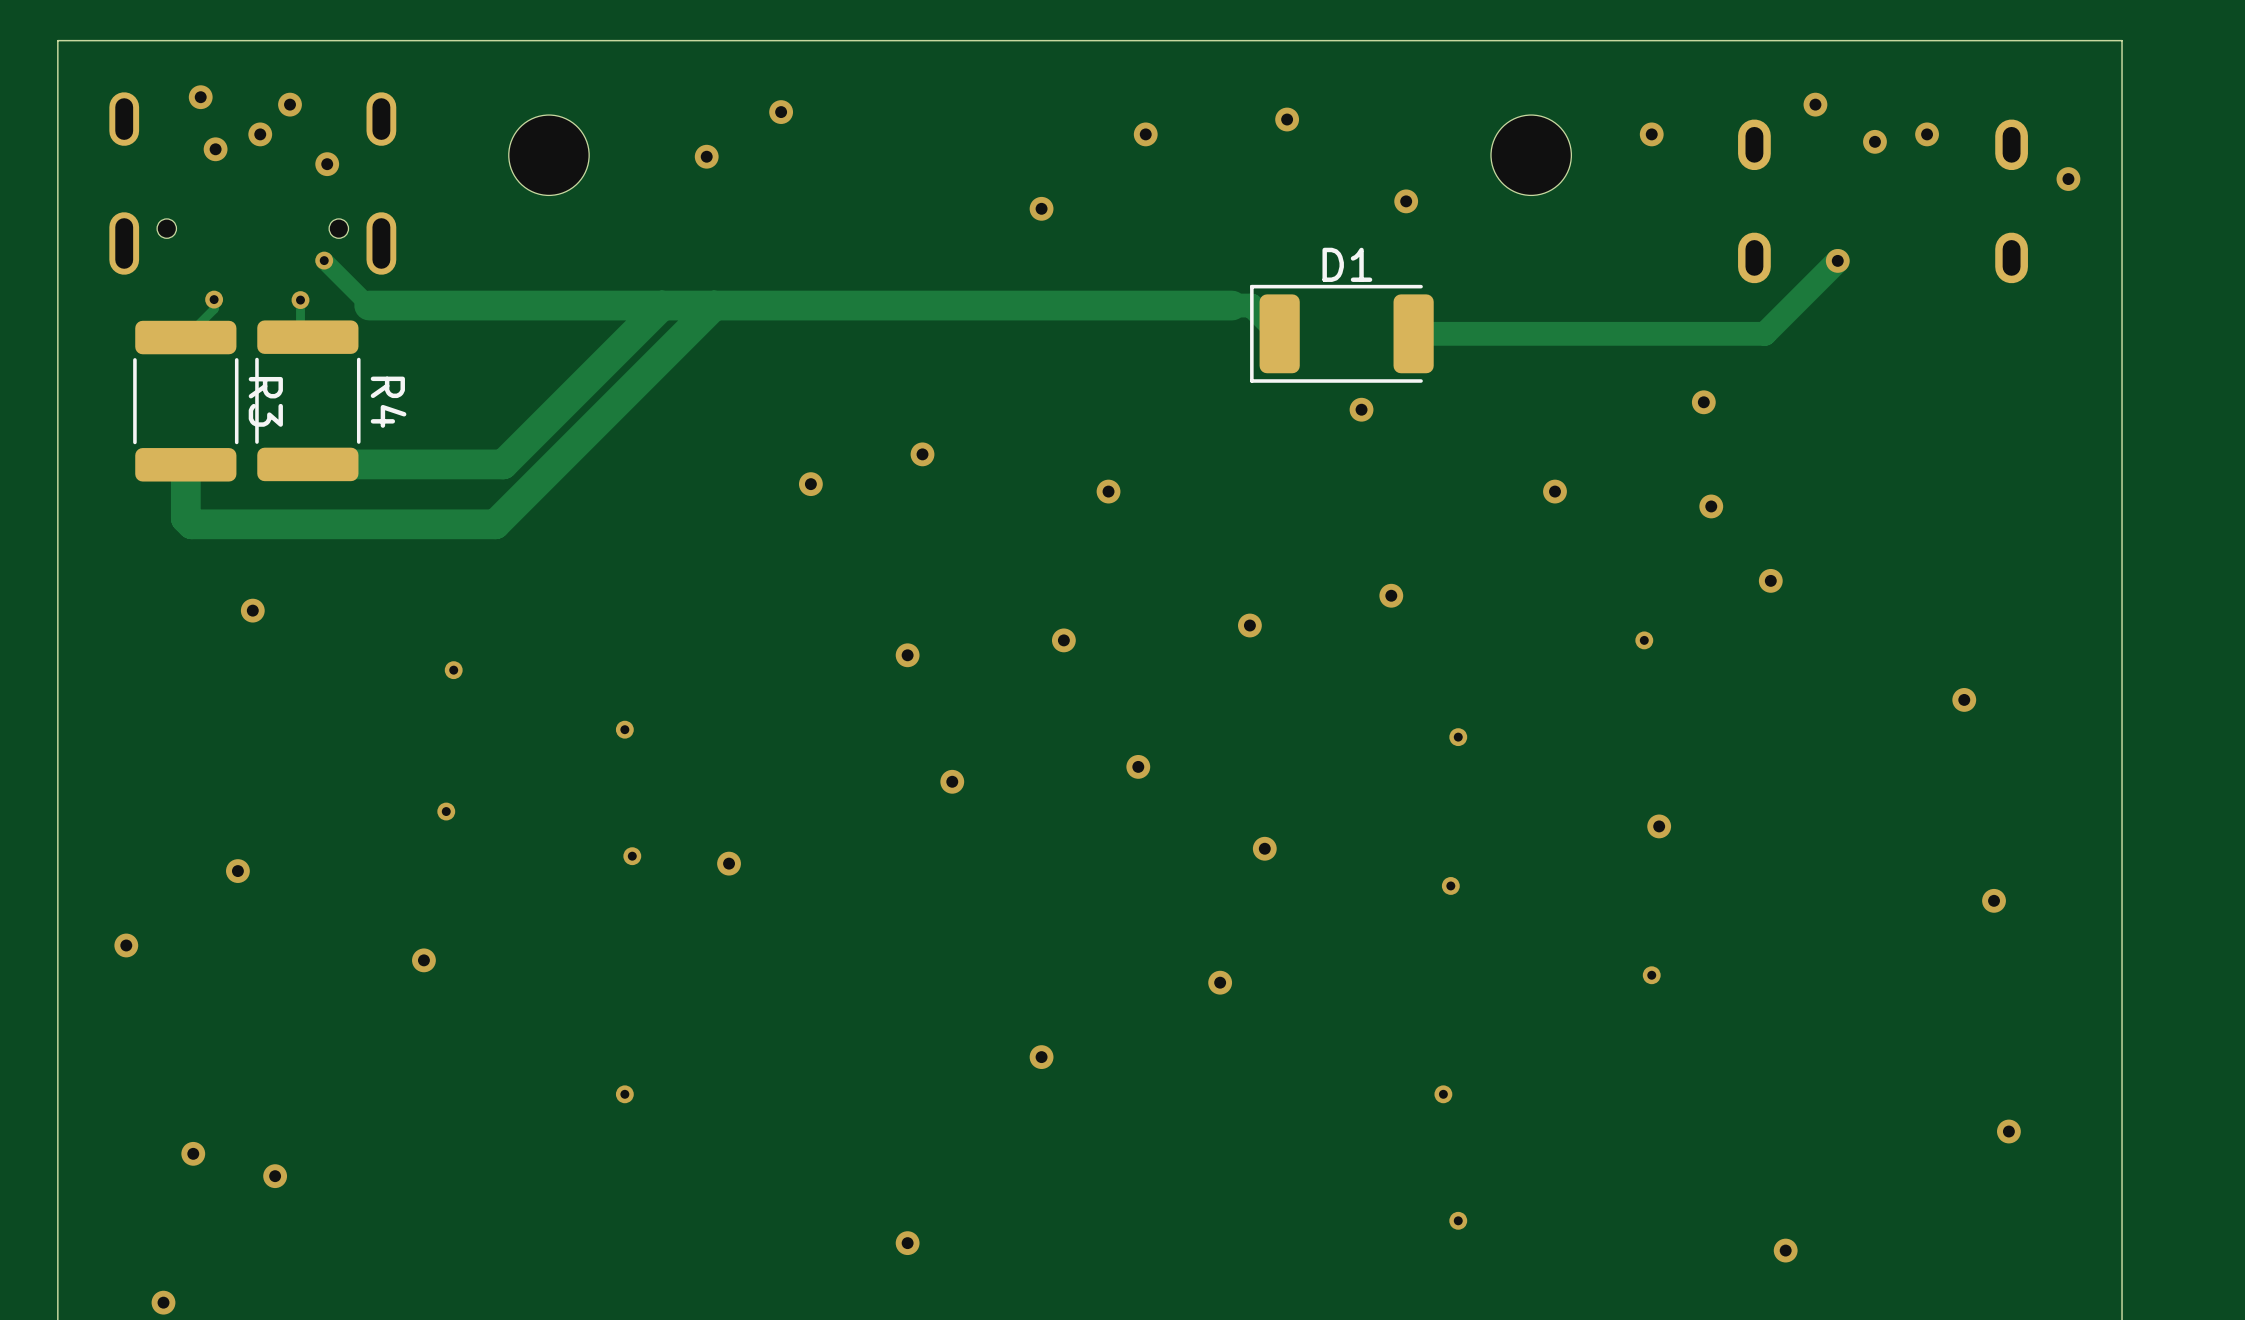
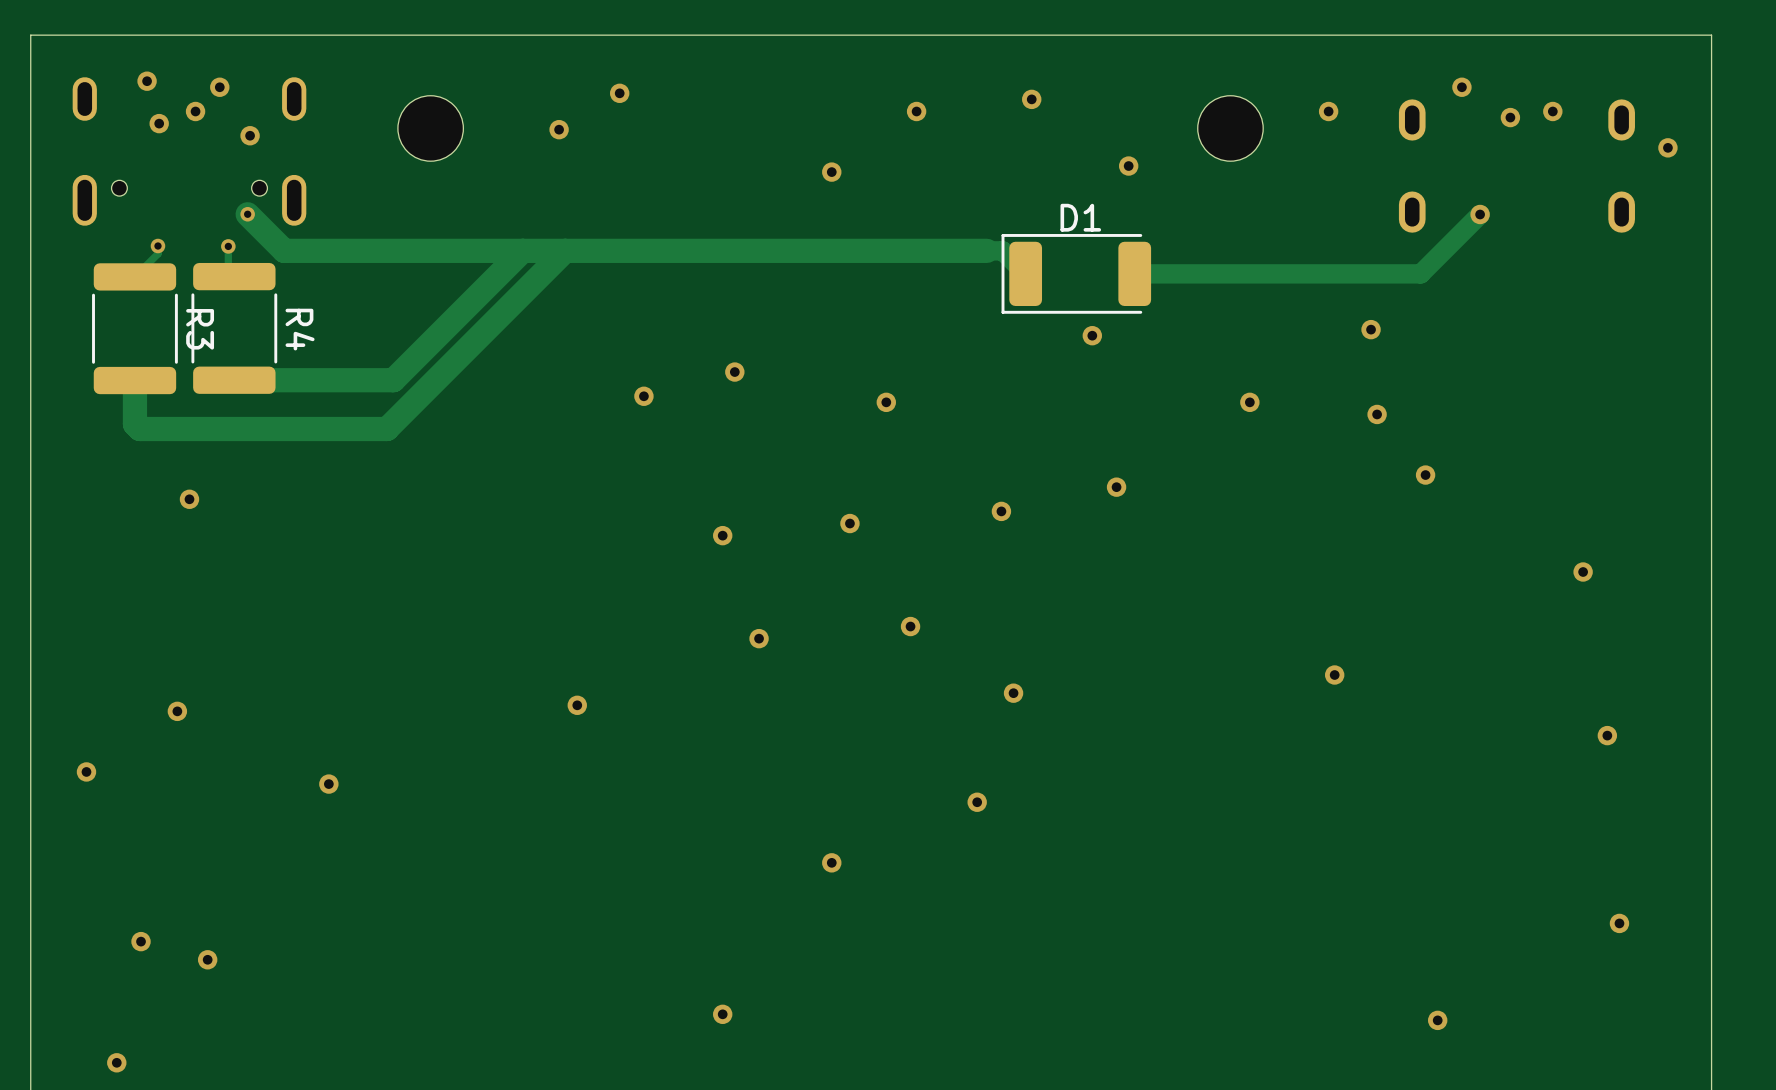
track width: thin (324, 260) (369, 305) -> thick (247, 214) (284, 250)
via: (1644, 640) -> none
via: (453, 670) -> none
via: (624, 729) -> none
via: (1458, 737) -> none
via: (446, 811) -> none
via: (632, 856) -> none
via: (1450, 885) -> none
via: (1651, 975) -> none
via: (624, 1094) -> none
via: (1443, 1094) -> none
via: (1458, 1220) -> none

